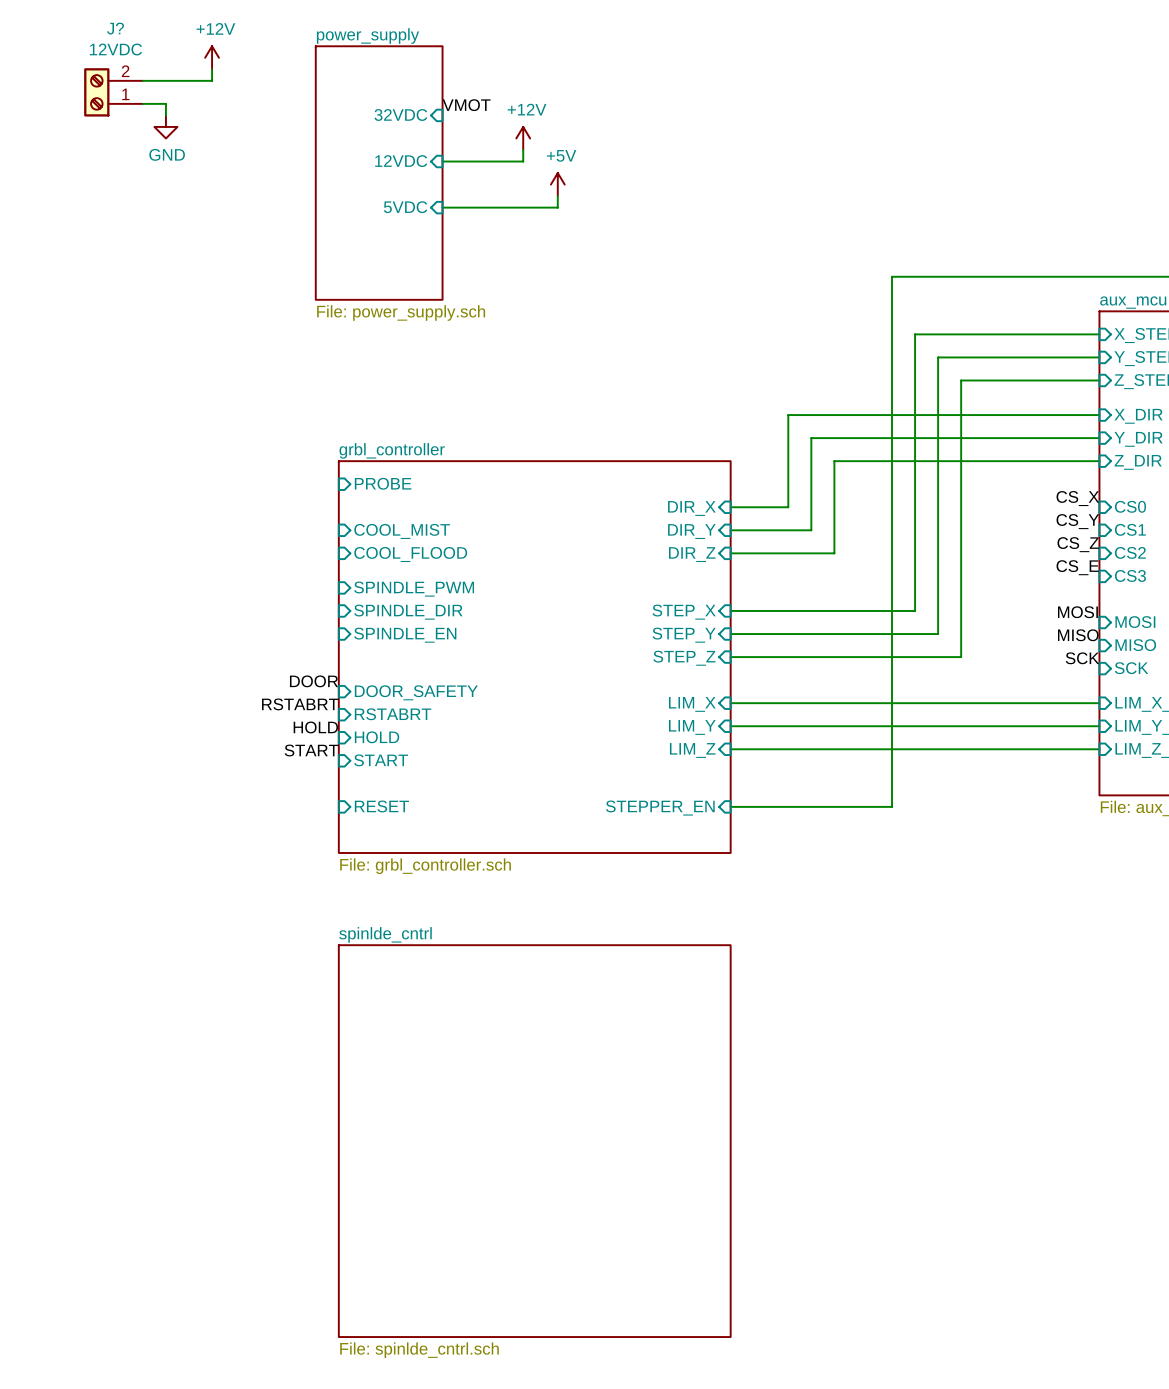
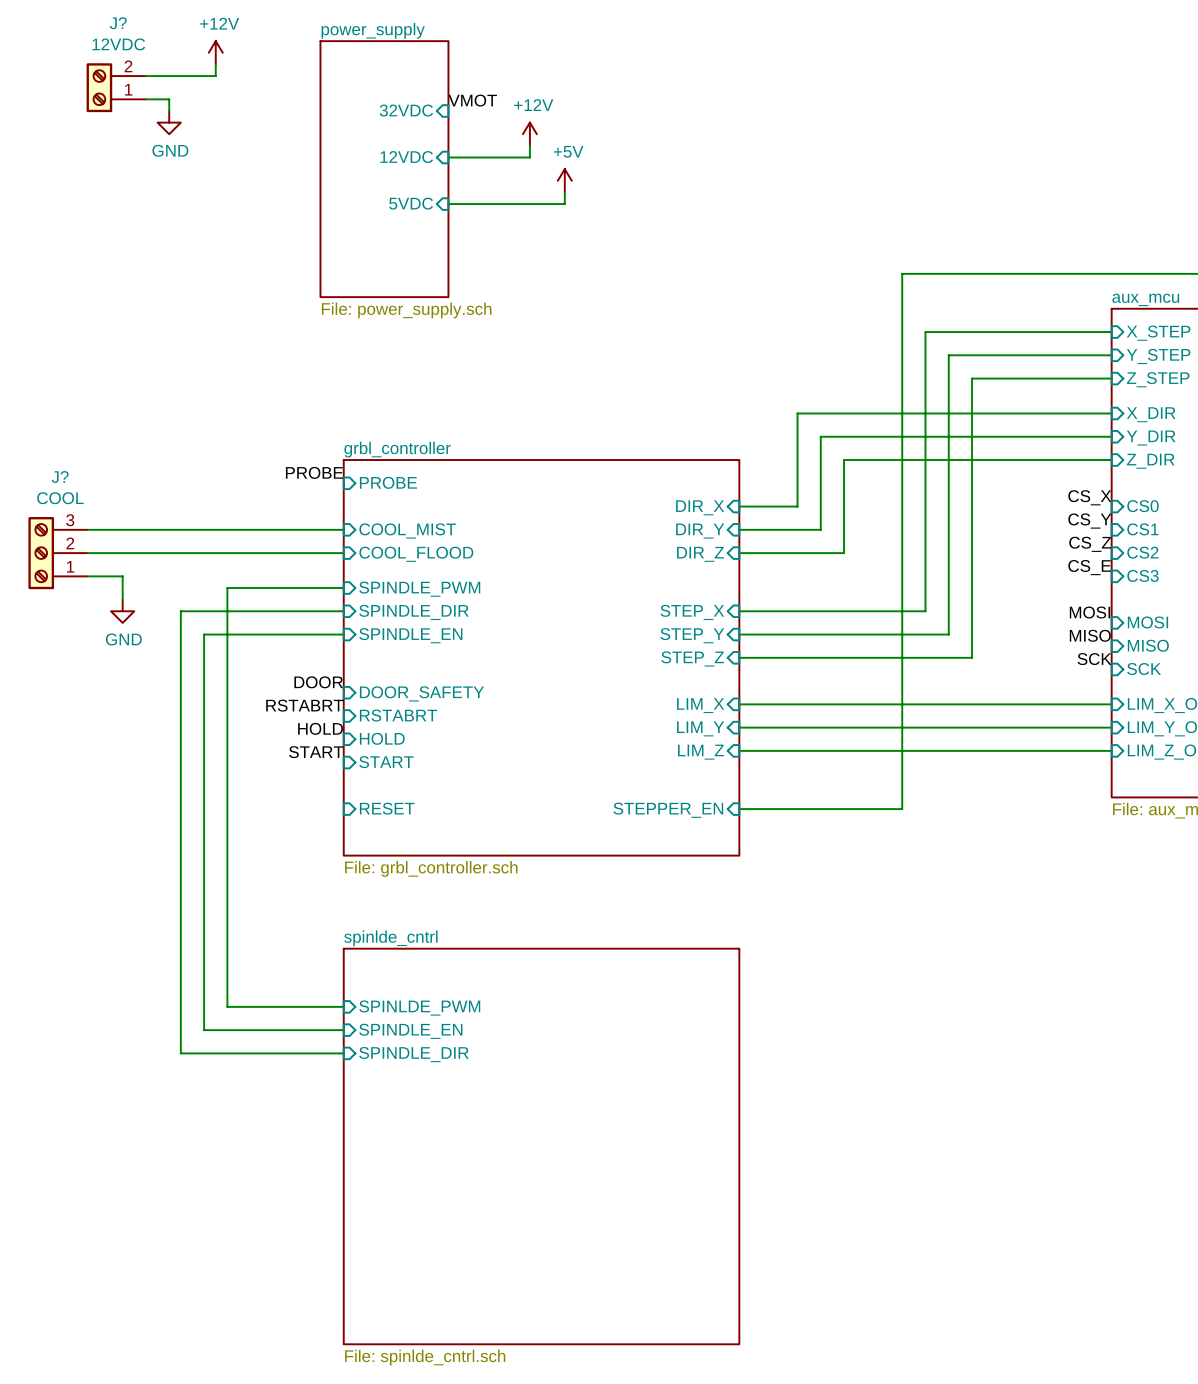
label: none -> PROBE (314, 472)
wire: none -> (87, 529) (343, 529)
J?: none -> COOL (58, 553)
wire: none -> (87, 553) (343, 553)
wire: none -> (87, 576) (122, 576) (122, 599)
wire: none -> (343, 588) (227, 588) (227, 1006) (343, 1006)
power symbol: none -> GND (122, 611)
wire: none -> (343, 611) (180, 611) (180, 1053) (343, 1053)
wire: none -> (343, 634) (204, 634) (204, 1030) (343, 1030)
sheet pin: none -> SPINLDE_PWM (419, 1008)
sheet pin: none -> SPINDLE_EN (410, 1031)
sheet pin: none -> SPINDLE_DIR (413, 1054)

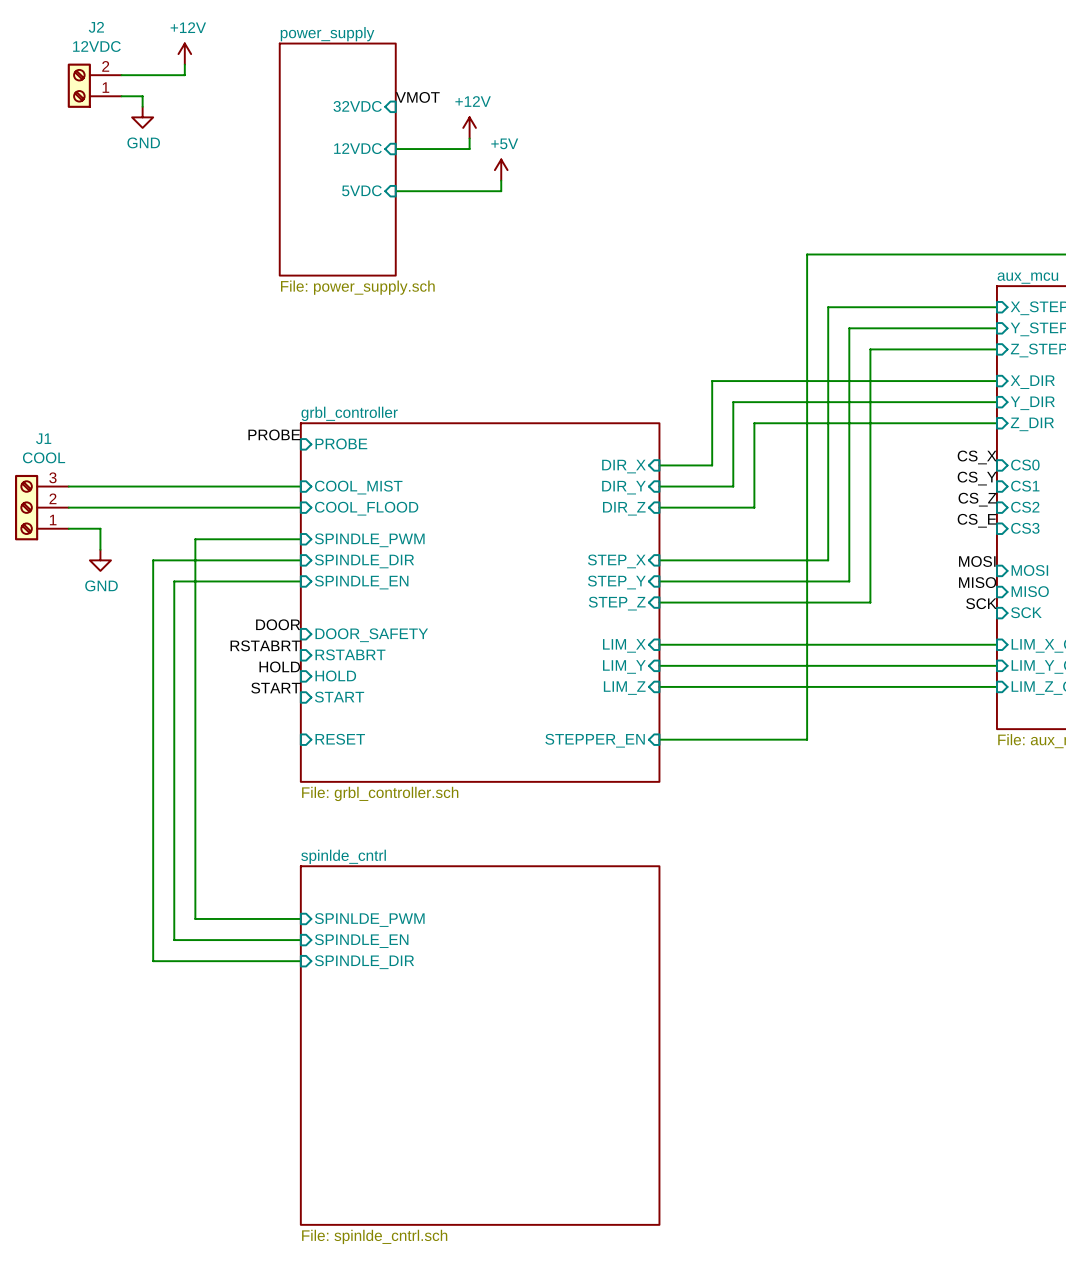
J? name: J? (118, 23) -> J2 (96, 27)
J? name: J? (60, 477) -> J1 (43, 438)

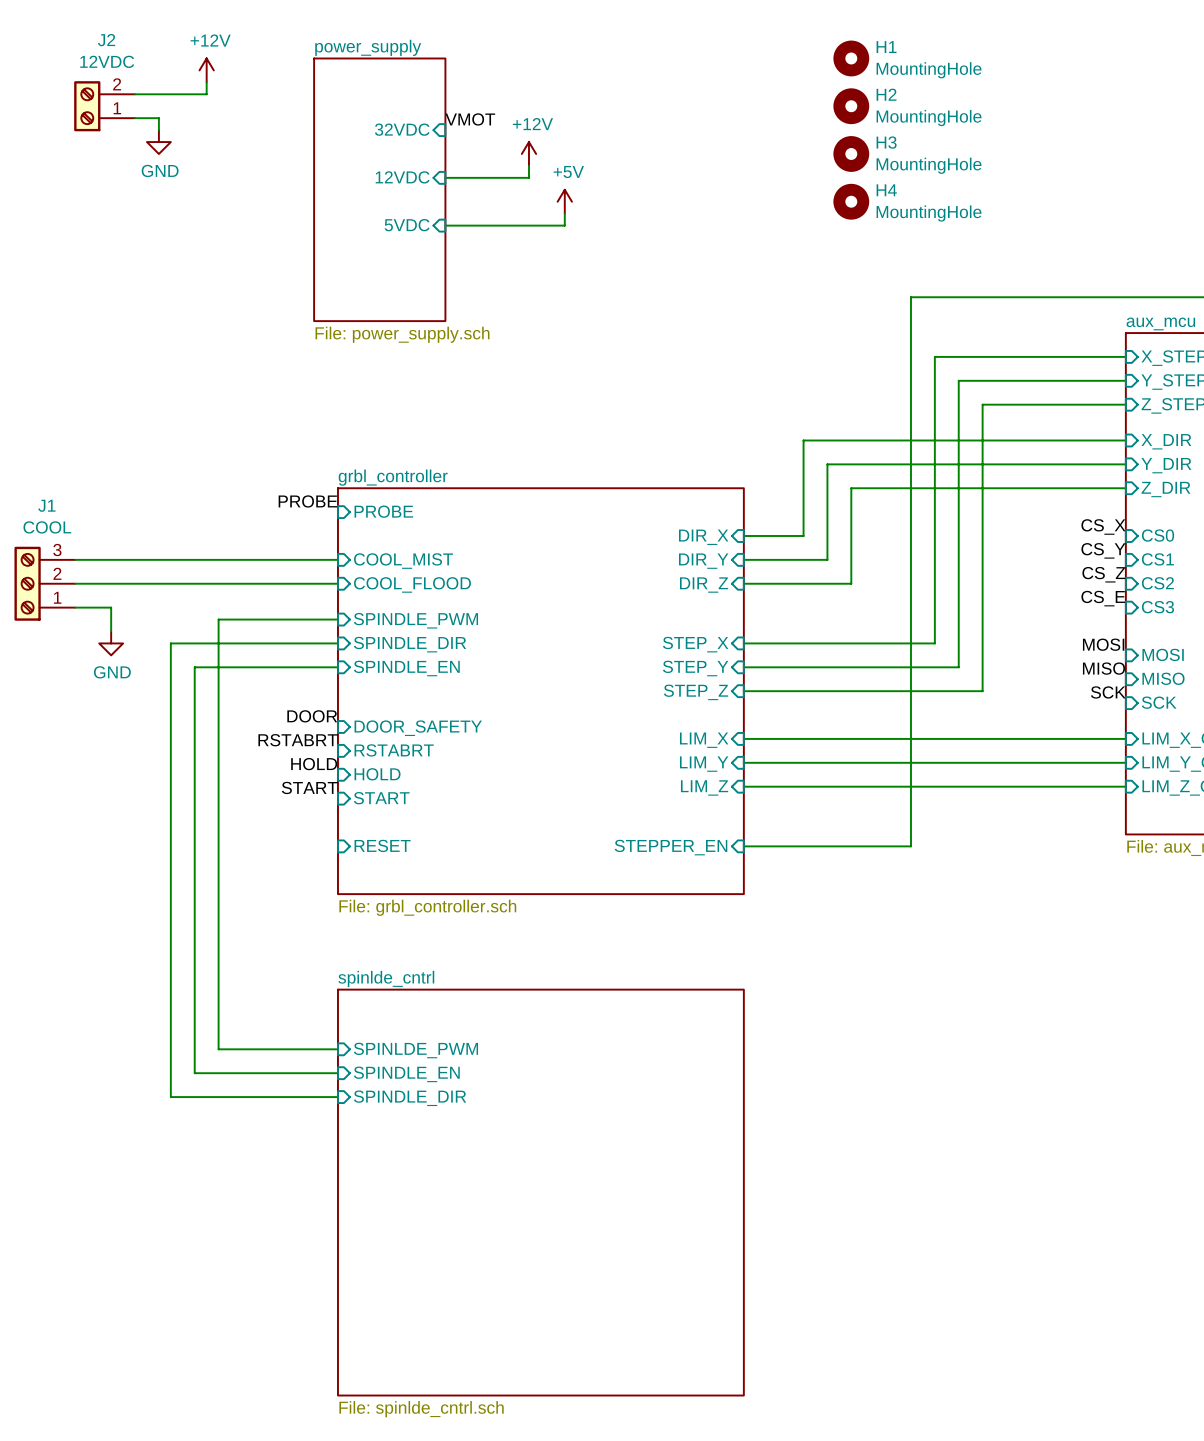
H1: none -> MountingHole (851, 58)
H2: none -> MountingHole (851, 106)
H3: none -> MountingHole (851, 153)
H4: none -> MountingHole (851, 201)

